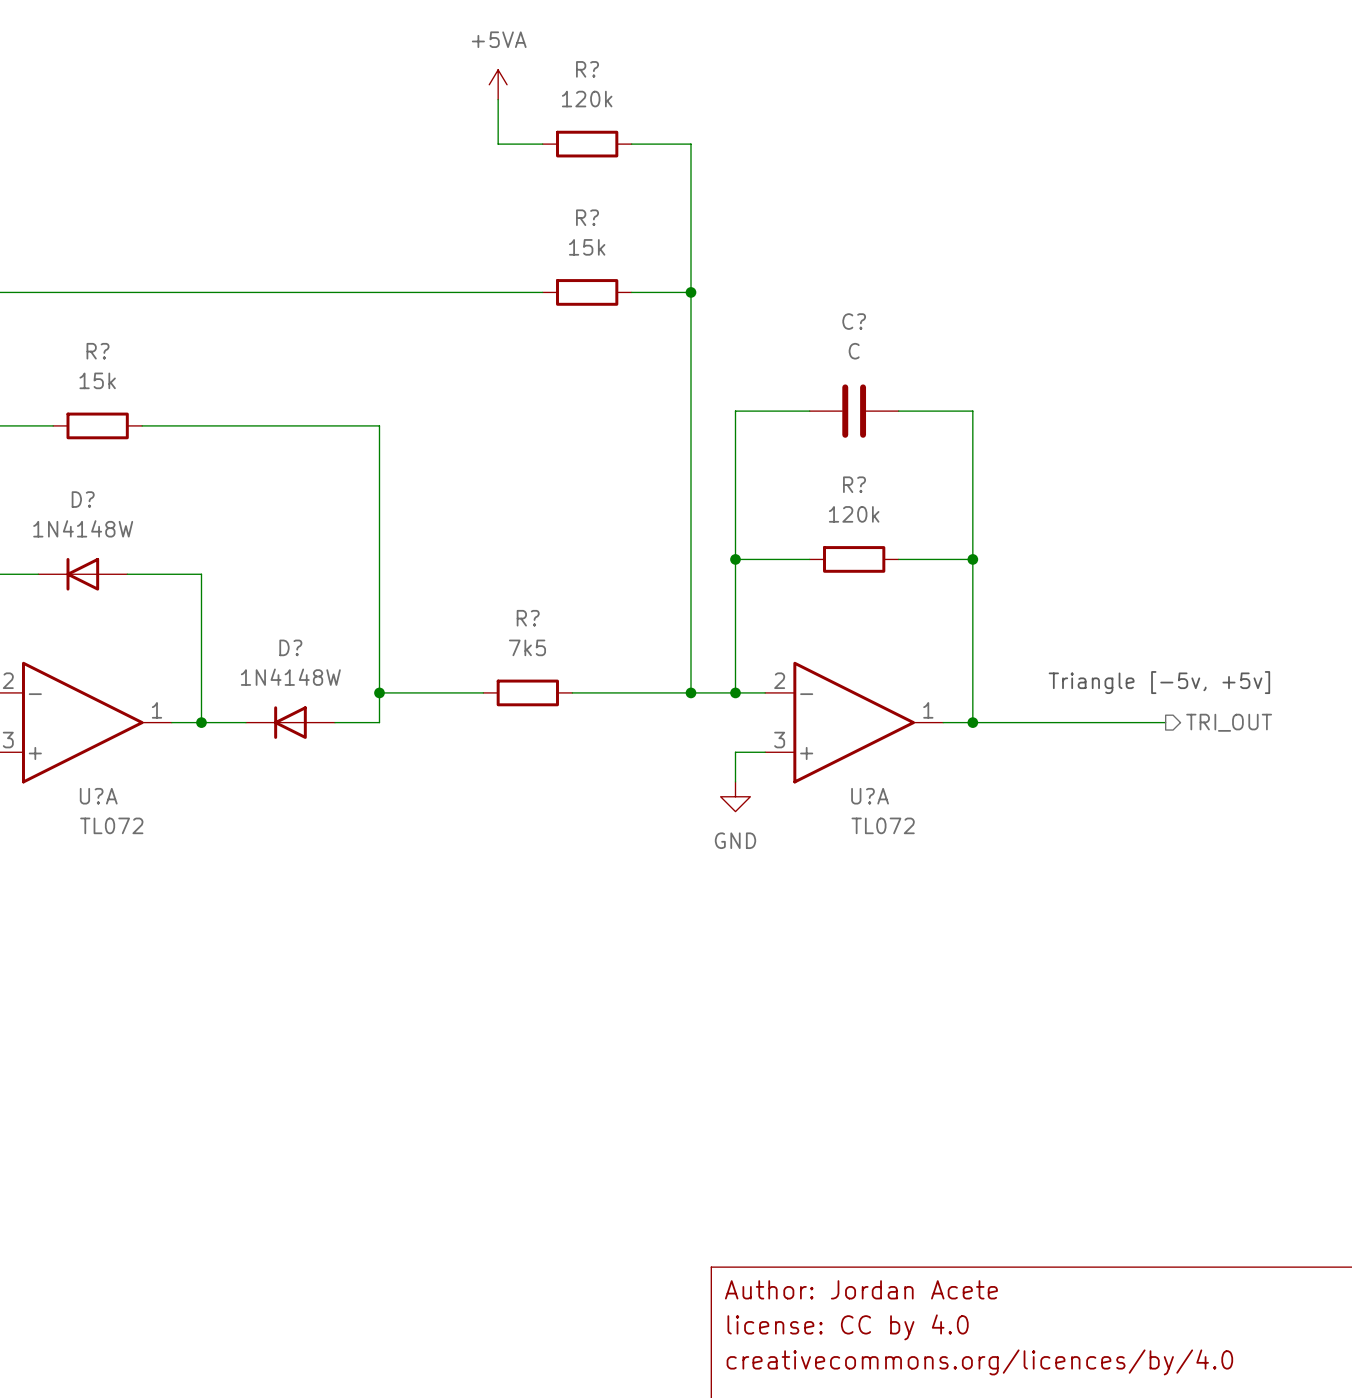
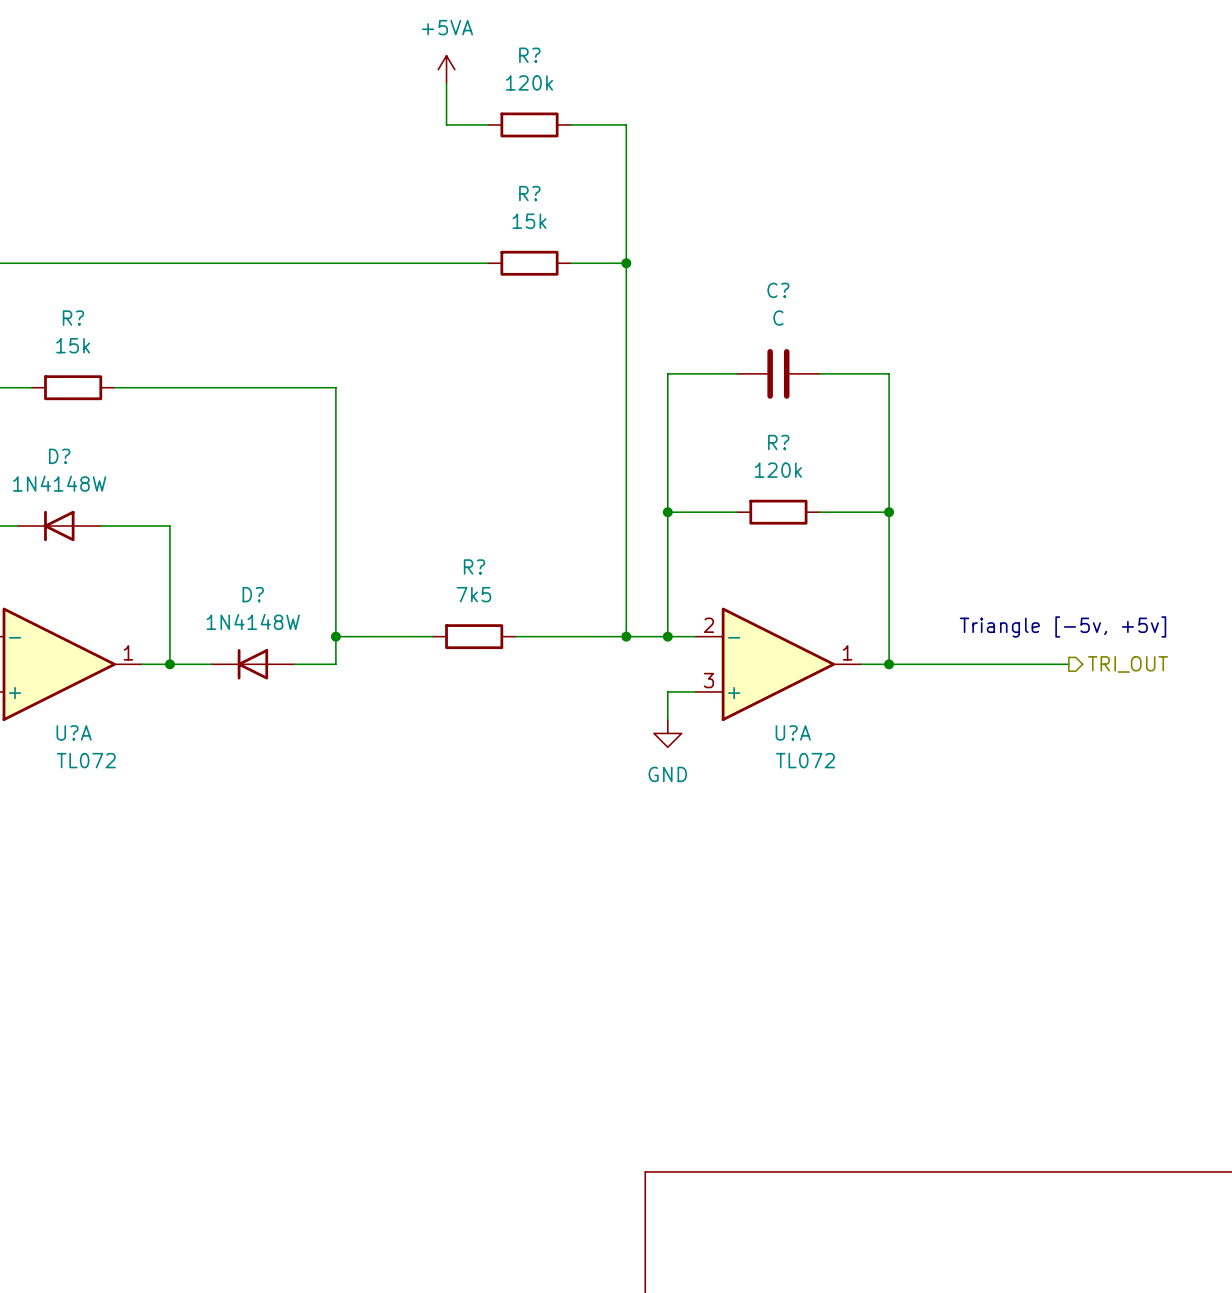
title block: Author: Jordan Acete (861, 1289) -> none
title block: license: CC by 4.0 (848, 1327) -> none
title block: creativecommons.org/licences/by/4.0 (979, 1362) -> none

